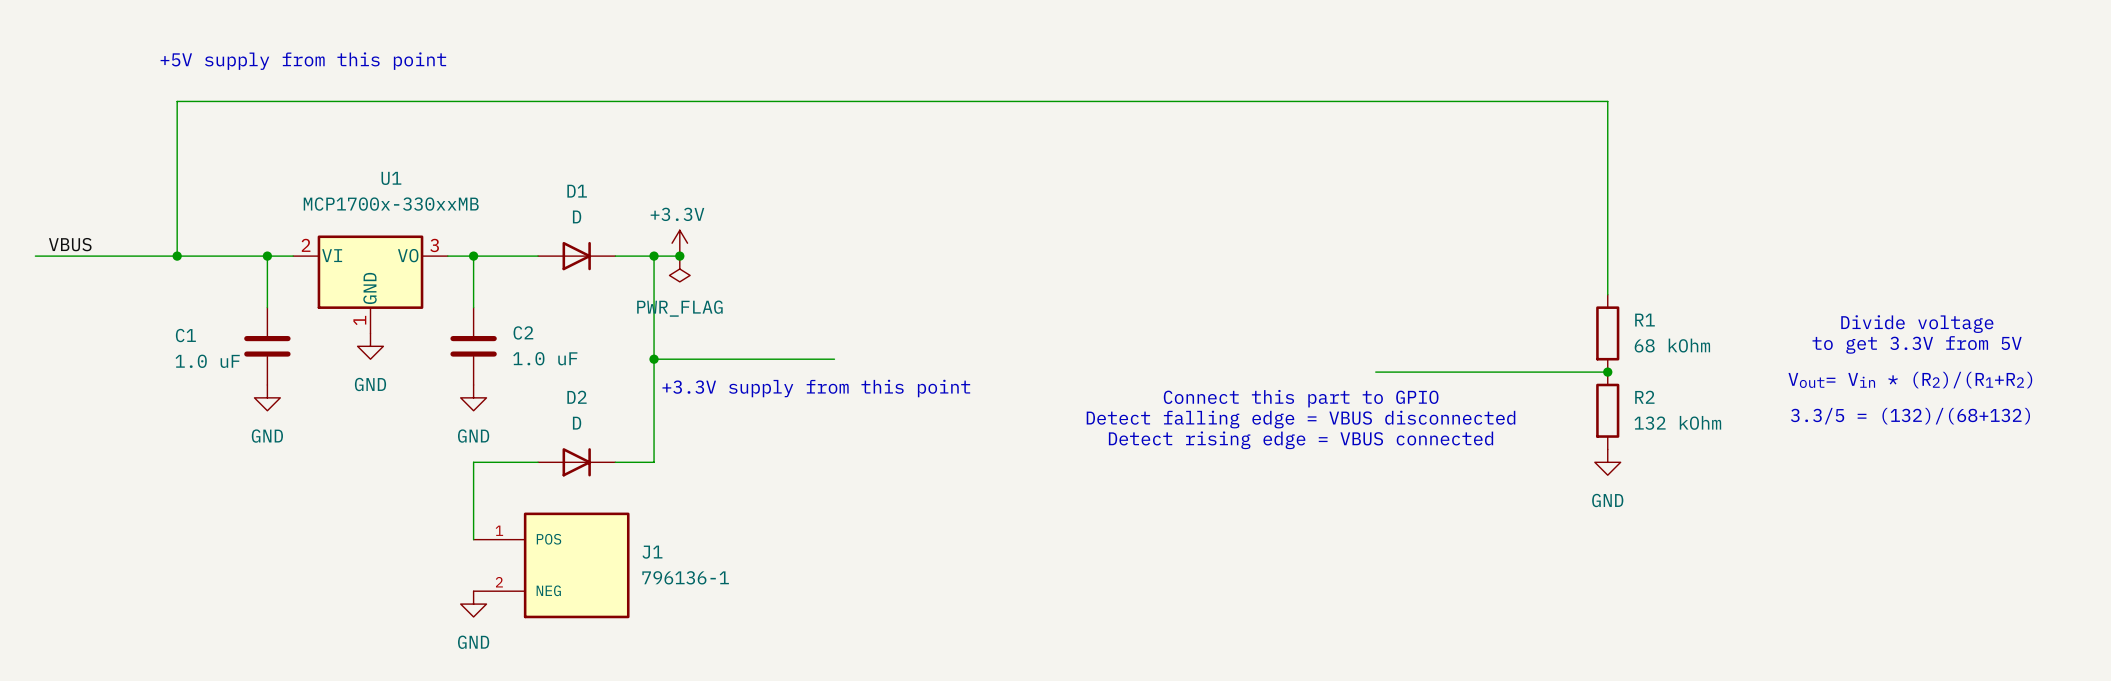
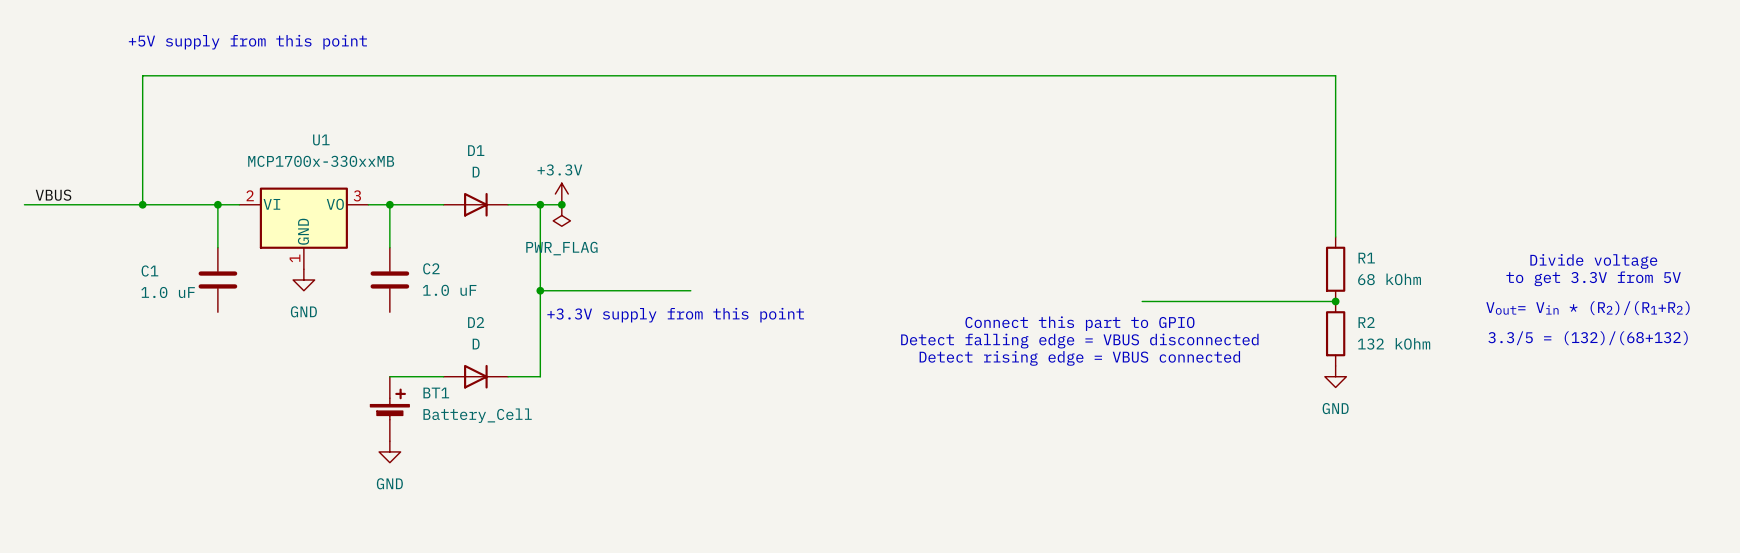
power symbol: GND (267, 397) -> none
power symbol: GND (473, 397) -> none
BT1: none -> Battery_Cell (389, 408)
J1: 796136-1 (551, 565) -> none
power symbol position: GND (473, 604) -> GND (389, 451)

